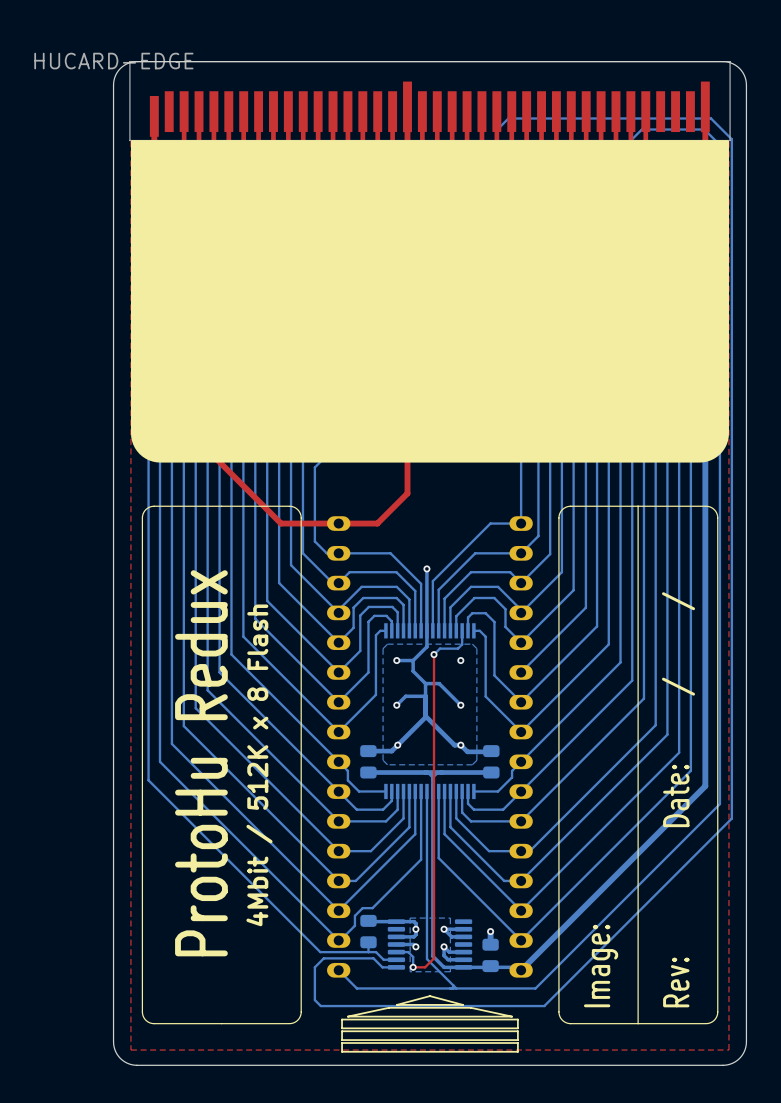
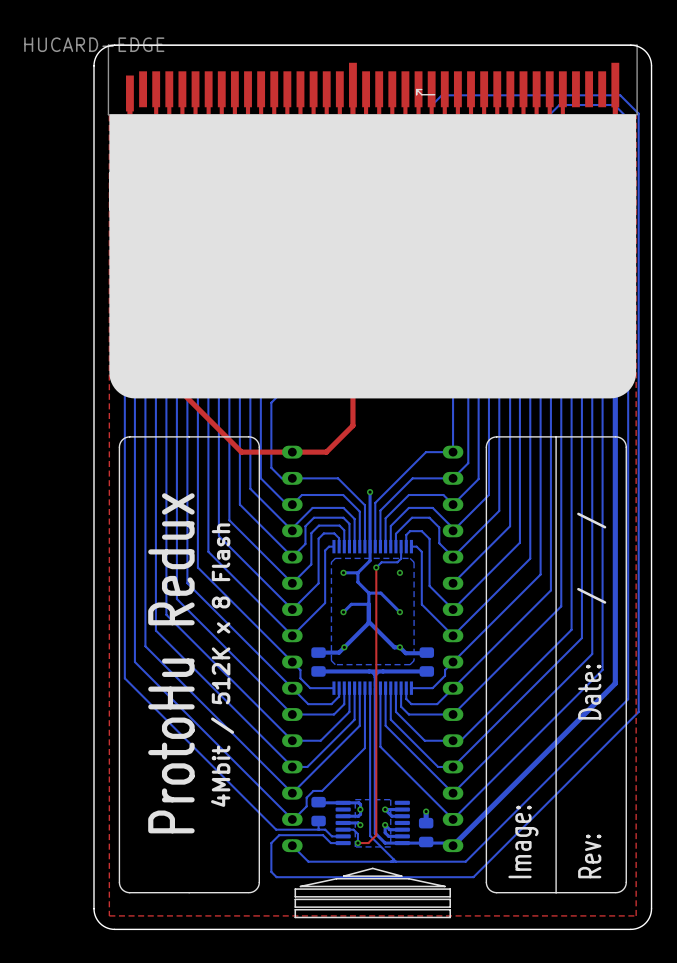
line: none -> (416, 89) (421, 89)
line: none -> (416, 89) (421, 94) (434, 94)

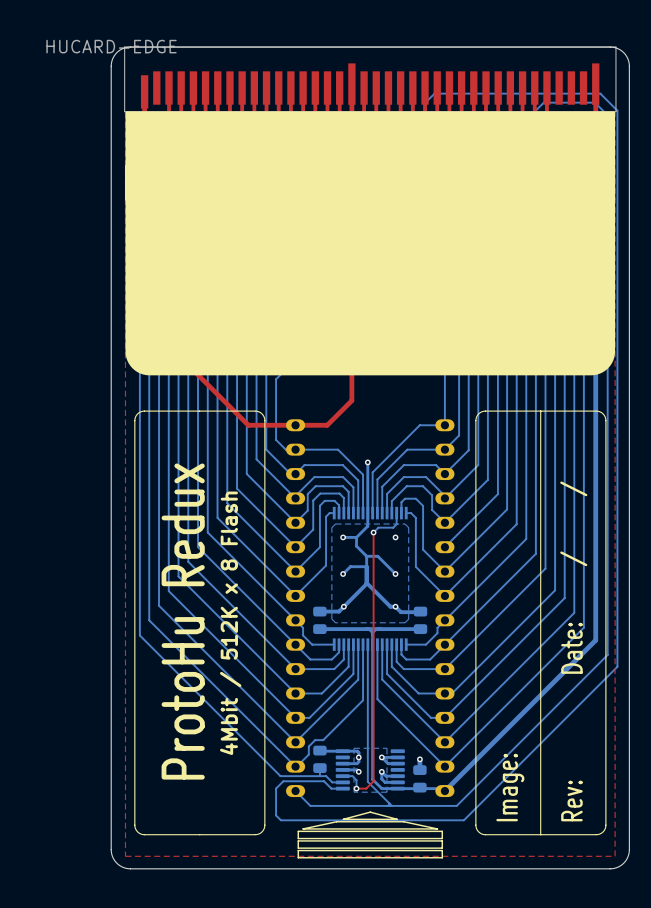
line: (416, 89) (421, 89) -> none
line: (416, 89) (421, 94) (434, 94) -> none

